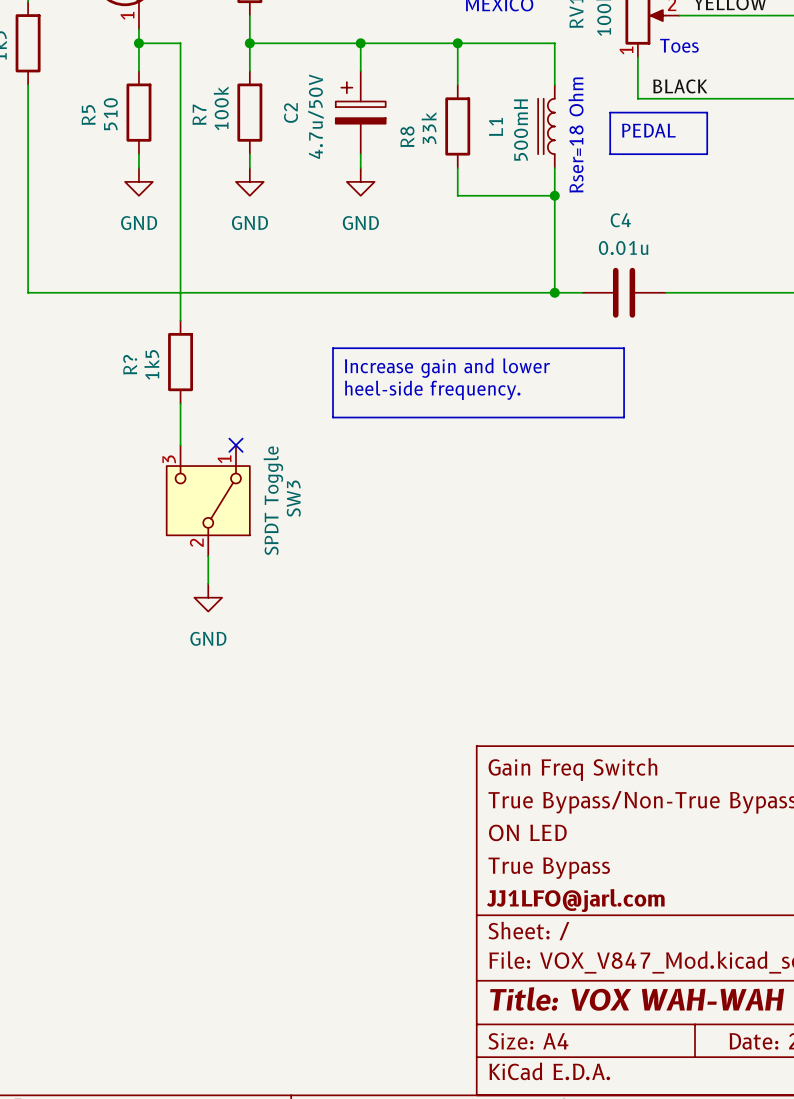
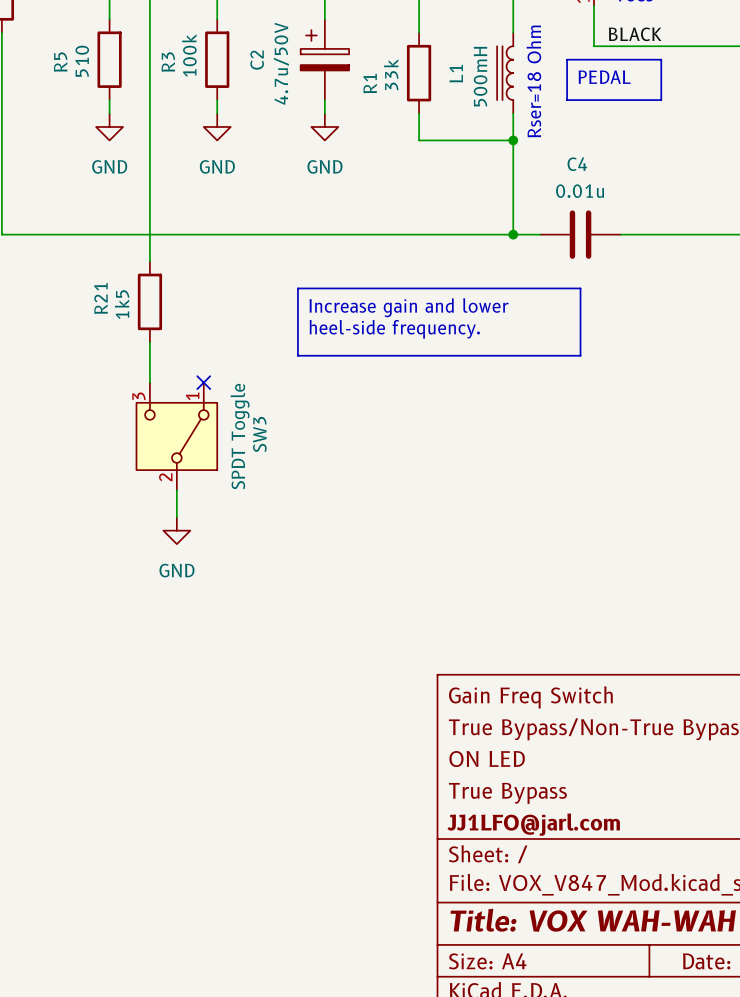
R7 name: R7 (199, 114) -> R3 (168, 62)
R8 name: R8 (407, 136) -> R1 (370, 83)
R? name: R? (130, 364) -> R21 (101, 298)

